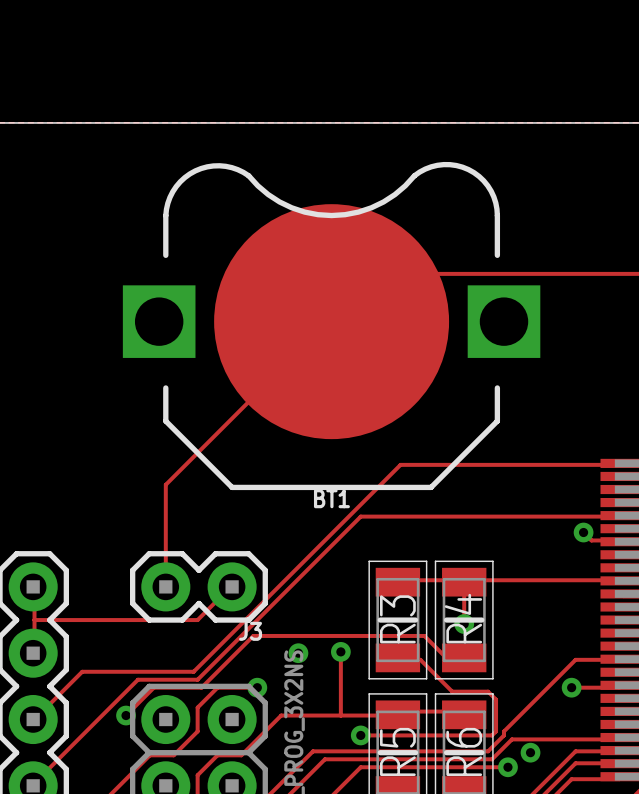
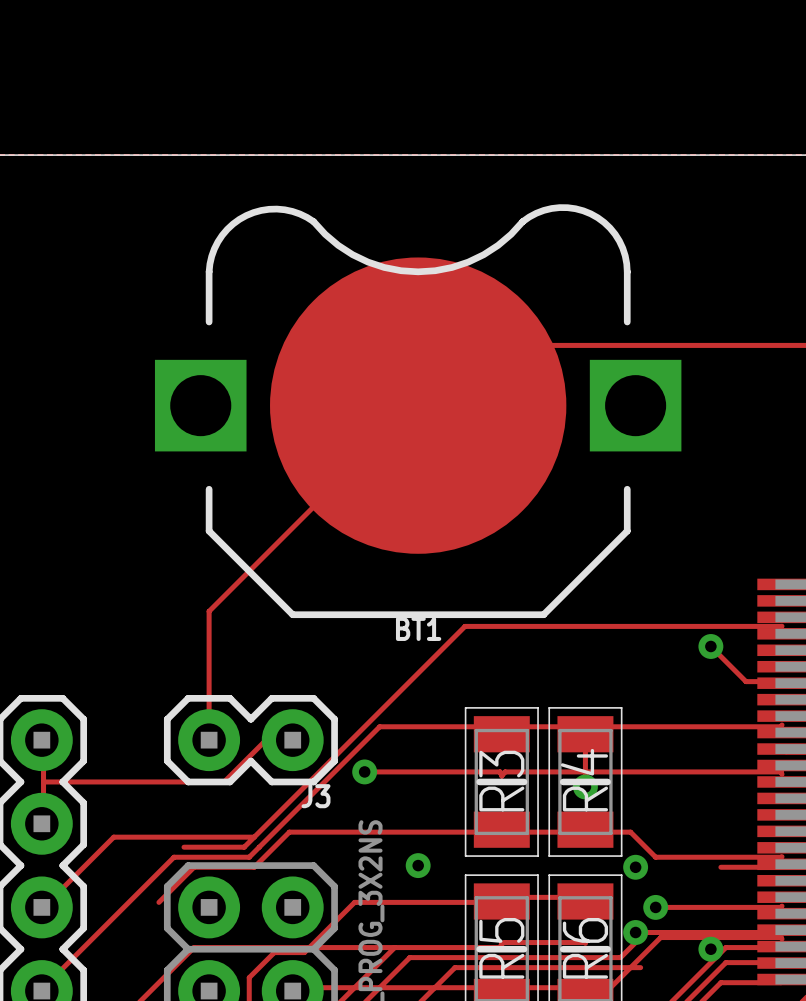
track: (620, 463) (400, 464) (368, 496) -> (782, 626) (465, 626)
track: none -> (710, 646) (735, 671)
track: (620, 515) (360, 516) (301, 576) -> (782, 725) (781, 726) (379, 726)
via position: (583, 532) -> (710, 646)
track: (620, 580) (400, 580) (397, 582) -> none
track: (229, 588) (197, 620) (177, 620) -> (289, 741) (264, 741) (224, 781)
track: none -> (364, 771) (500, 771) (501, 776) (505, 771) (781, 771) (782, 774)
via: none -> (364, 771)
track: (340, 651) (340, 715) -> none
via: (340, 651) -> none
via: (298, 653) -> none
track: (464, 657) (464, 655) (444, 655) (424, 635) (253, 635) (229, 659) -> (505, 832) (289, 832)
track: (420, 659) (452, 691) (488, 691) (496, 699) (496, 731) (492, 735) (360, 735) -> (530, 832) (630, 832) (655, 857) (782, 856)
track: (620, 659) (575, 659) (504, 731) (504, 735) (488, 751) (396, 751) -> (585, 943) (505, 942) (501, 943) (500, 947)
track: (82, 671) (145, 671) -> (103, 847) (113, 837) (254, 837)
via: none -> (418, 865)
track: (257, 687) (217, 687) (197, 707) (197, 731) (173, 755) (149, 755) -> (394, 947) (194, 947) (189, 952)
via: (257, 687) -> none
via: none -> (635, 867)
via: (571, 687) -> none
via: (126, 715) -> none
track: none -> (782, 906) (655, 907)
via: none -> (655, 907)
via: (360, 735) -> none
via: none -> (635, 932)
track: none -> (782, 939) (660, 937) (610, 987) (294, 987) (292, 991)
via: (530, 752) -> none
via: none -> (710, 949)
via: (507, 767) -> none

